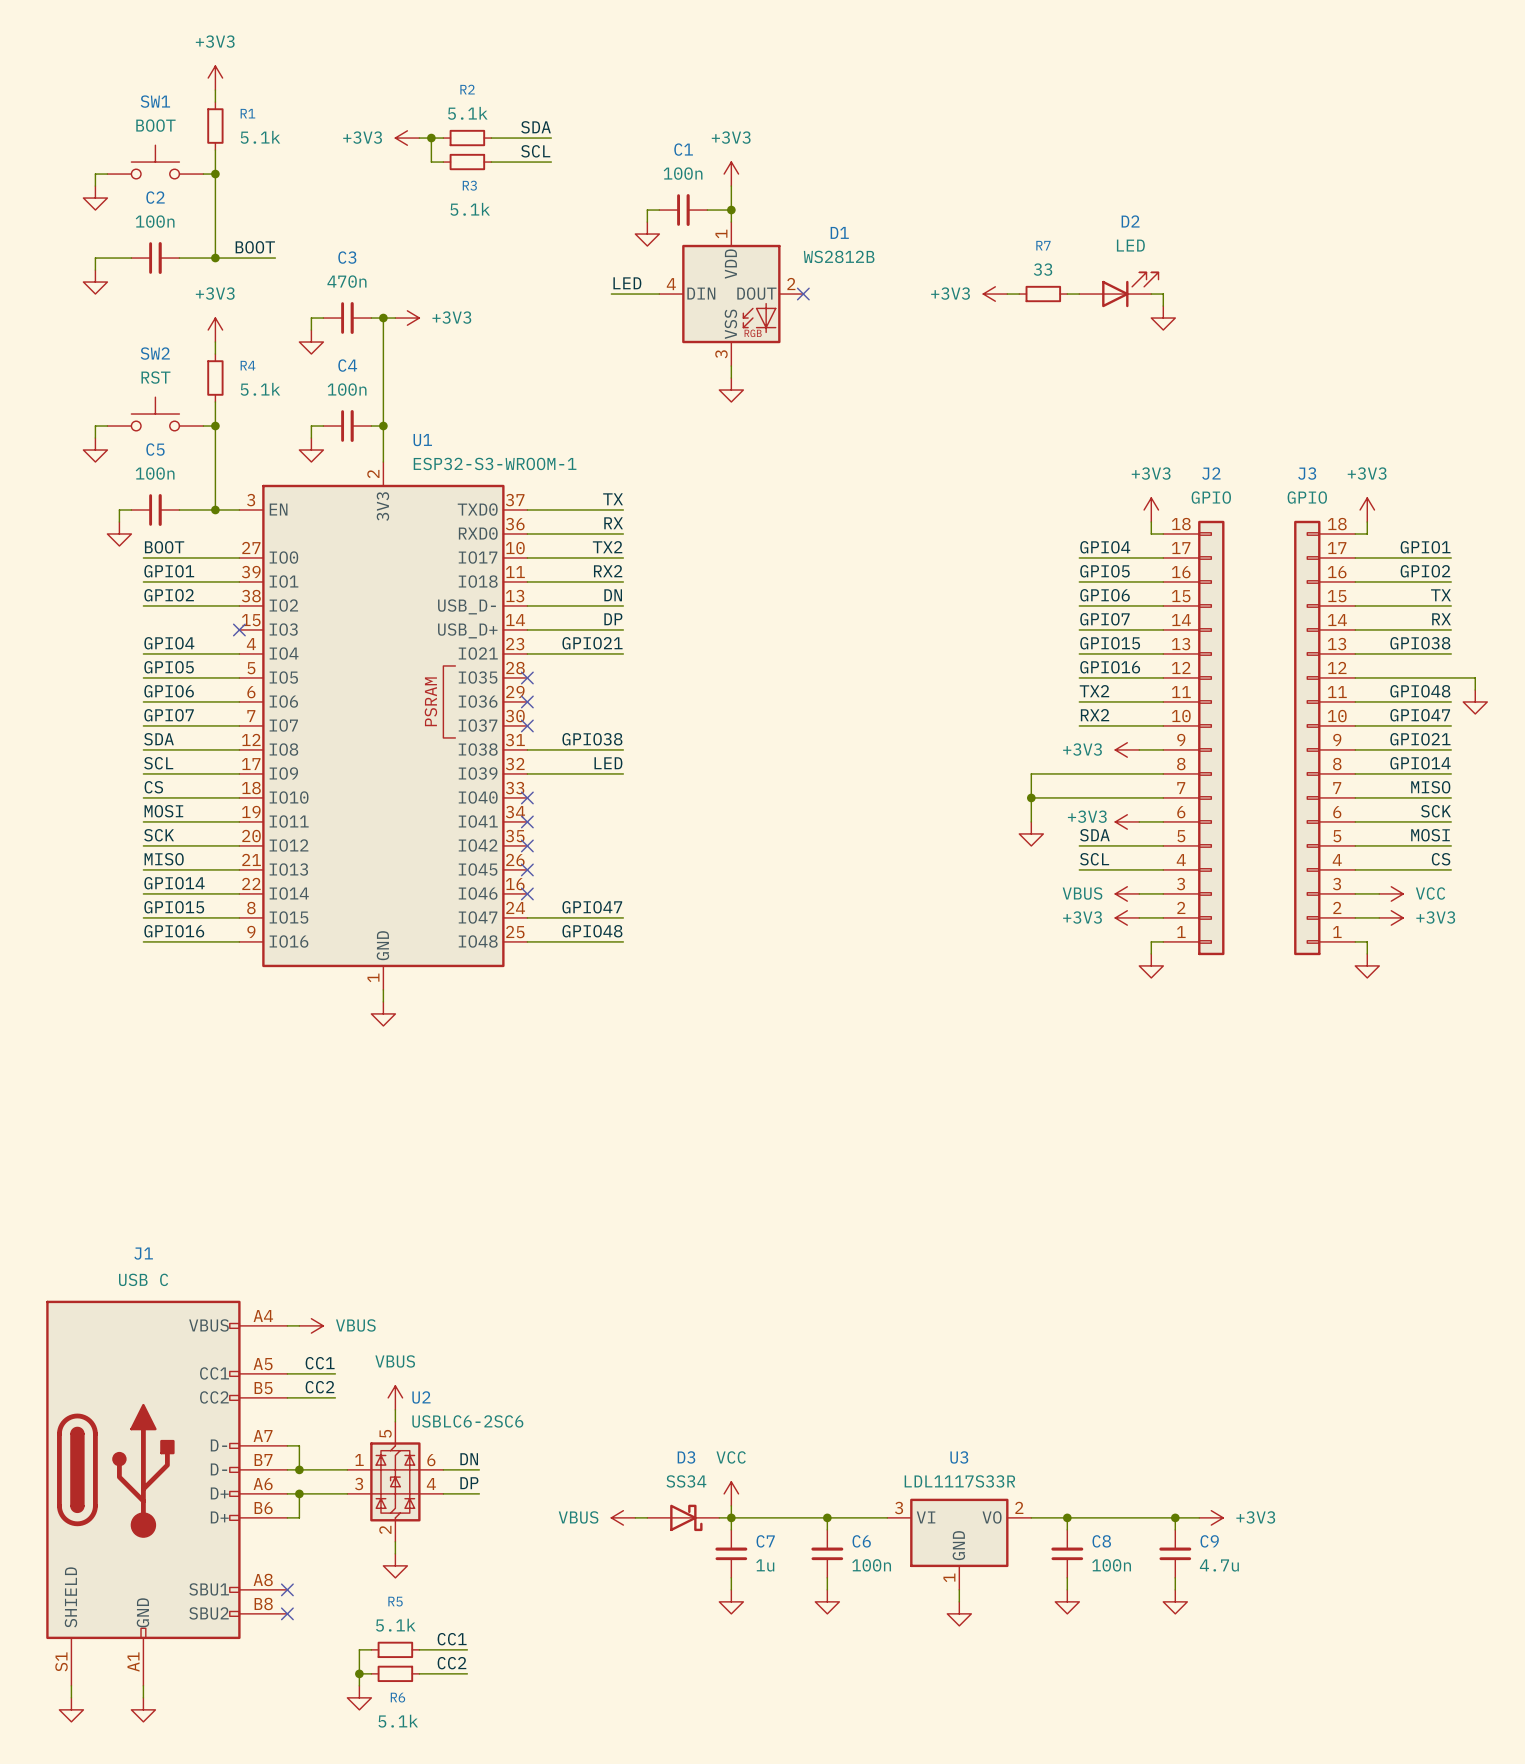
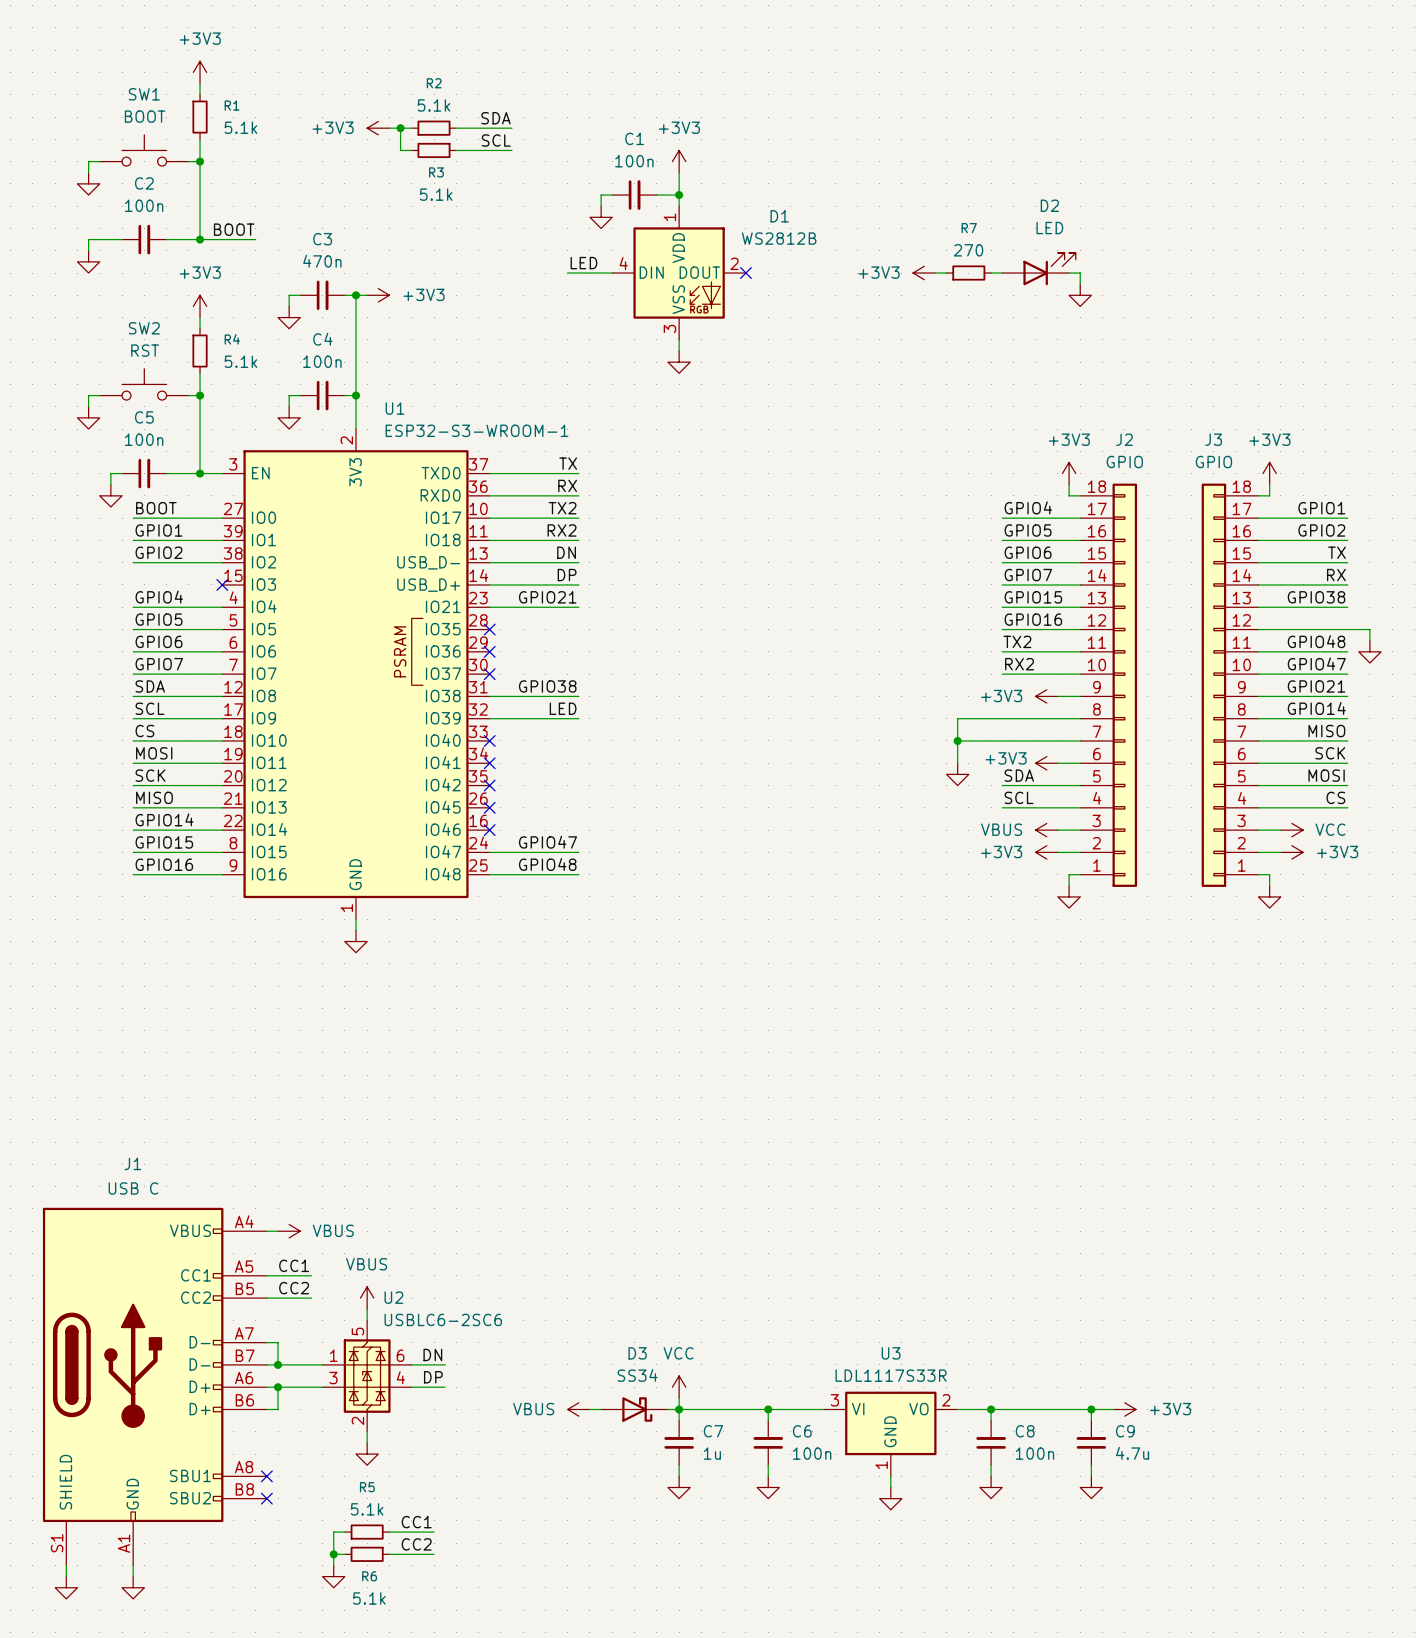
R7 value: 33 (1043, 269) -> 270 (968, 250)

